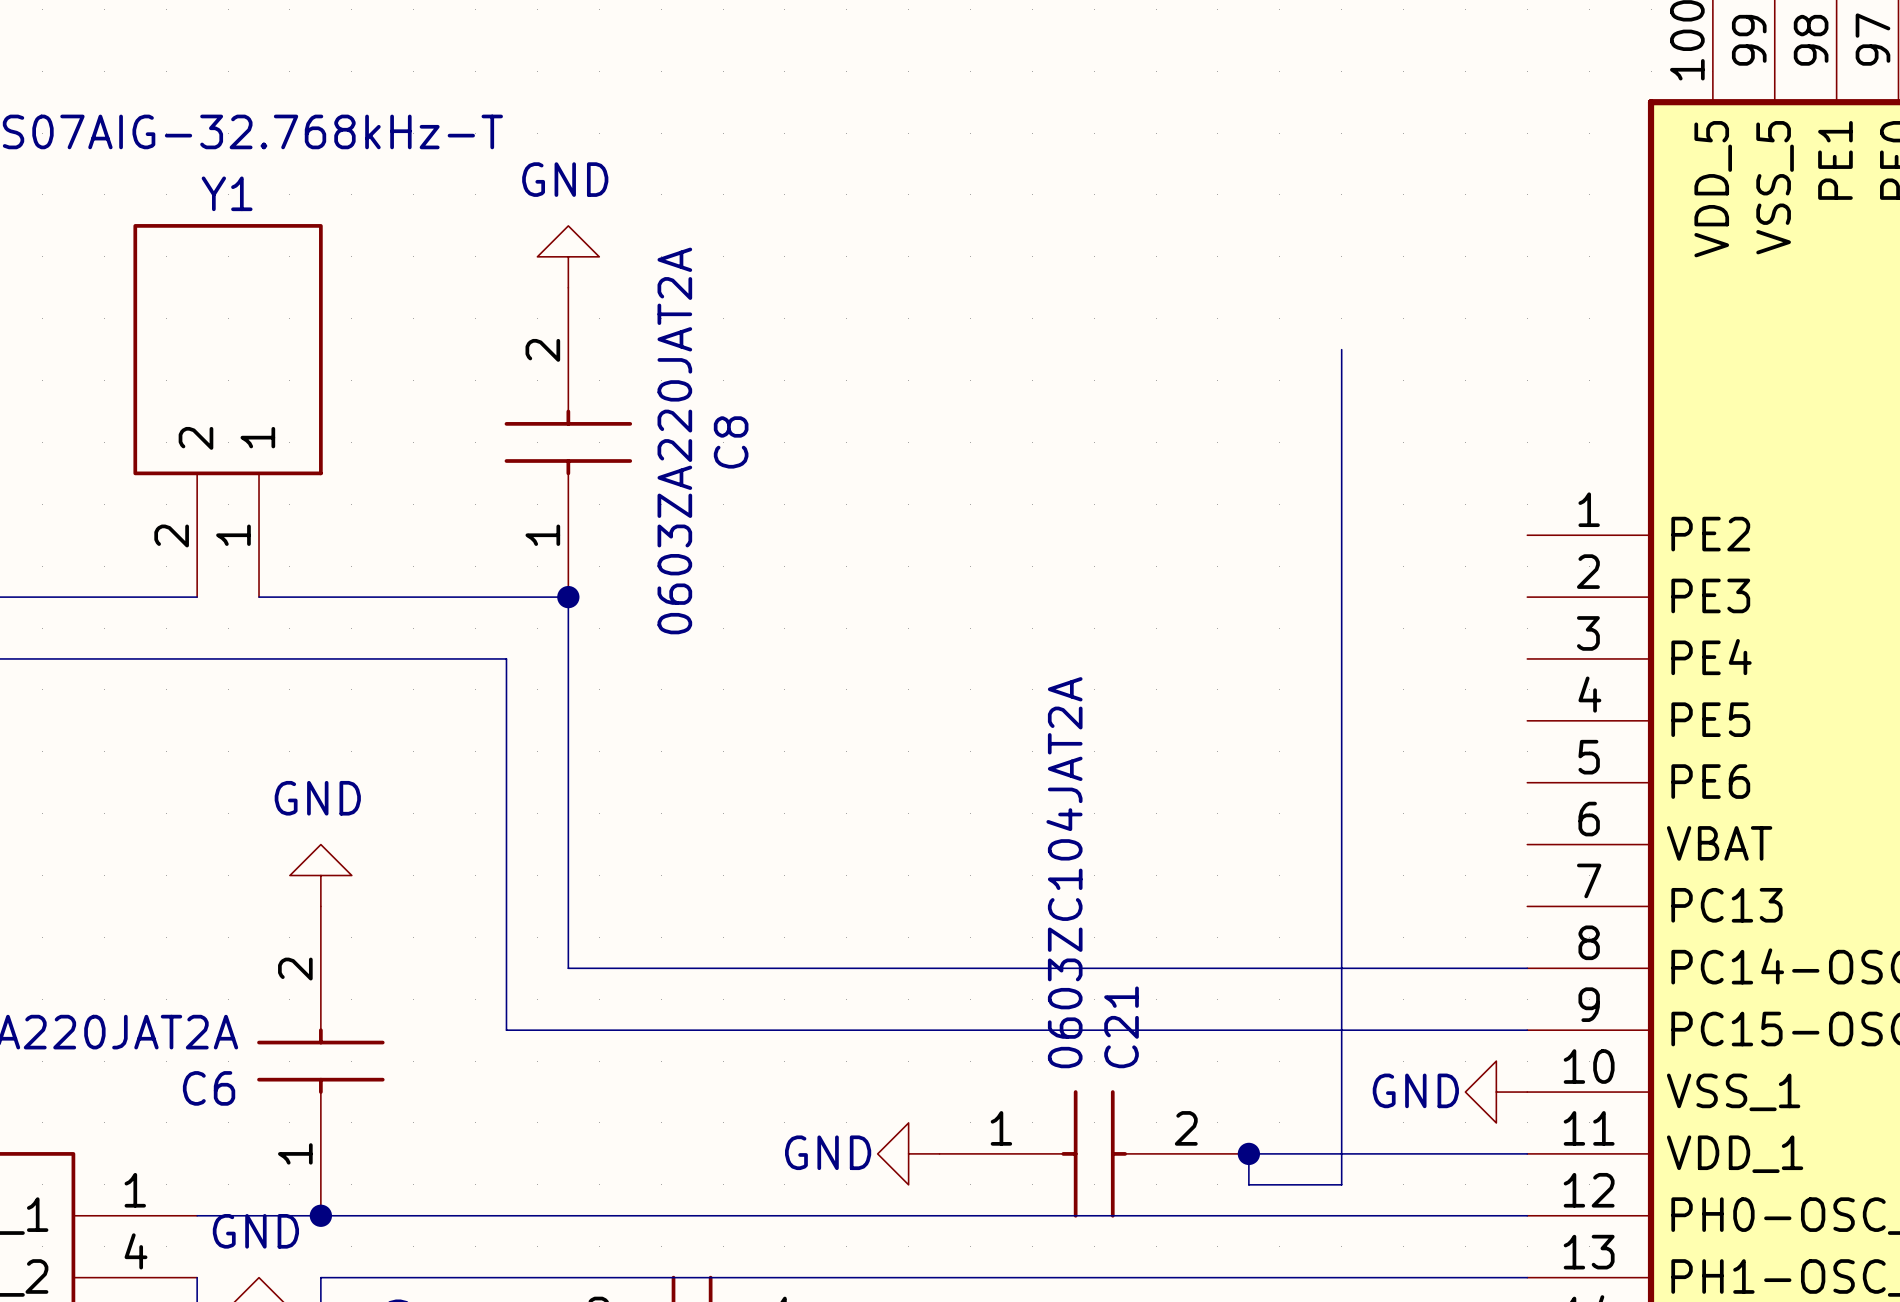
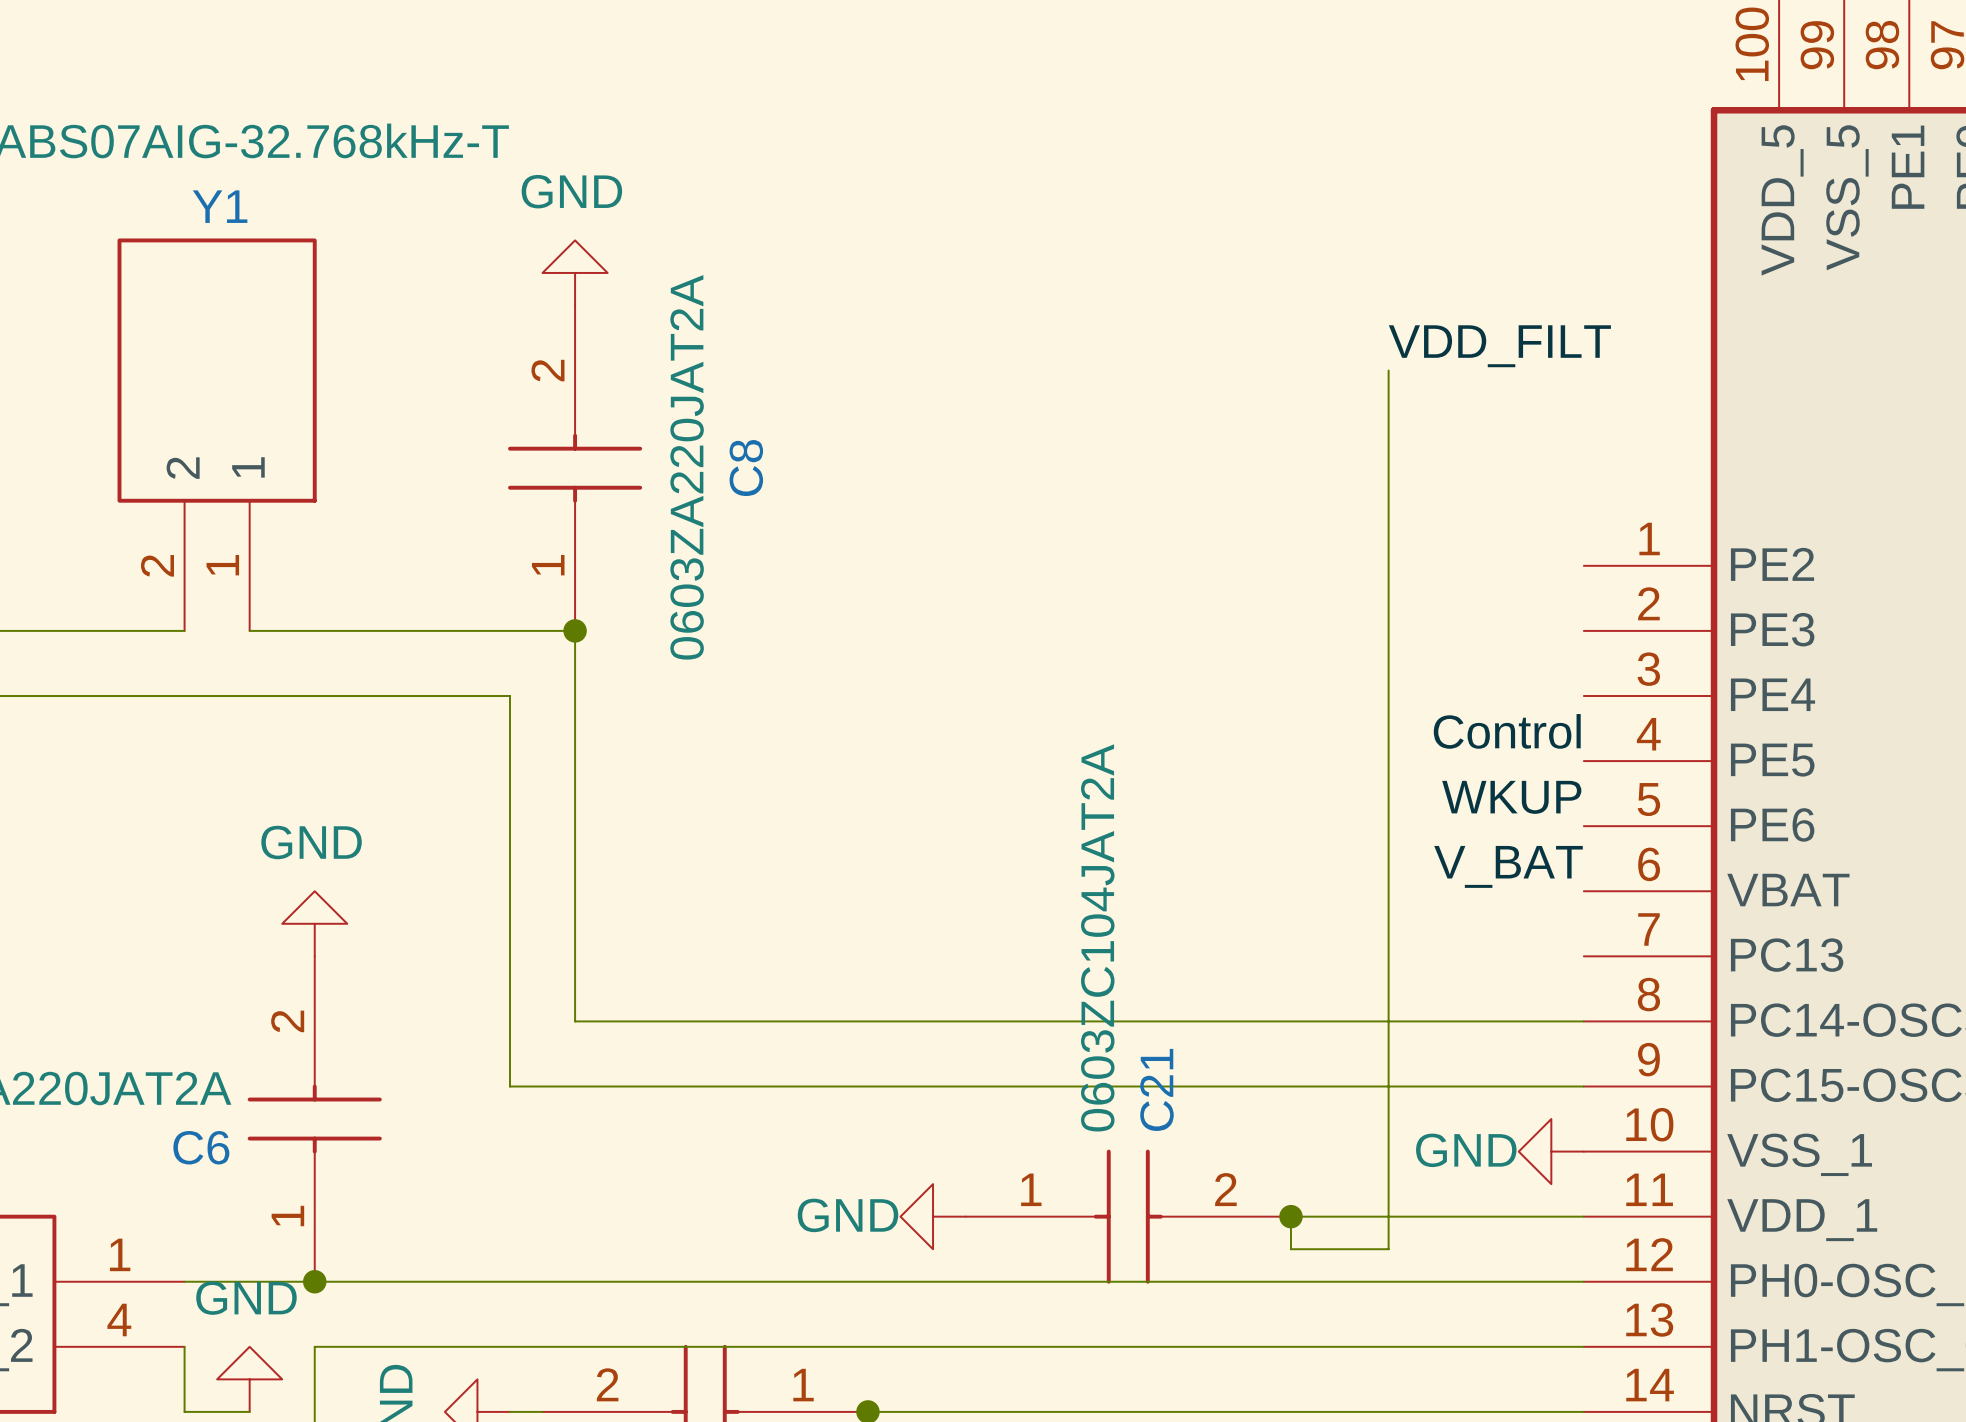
label: none -> VDD_FILT (1499, 346)
label: none -> Control (1507, 731)
label: none -> WKUP (1511, 797)
label: none -> V_BAT (1508, 866)

